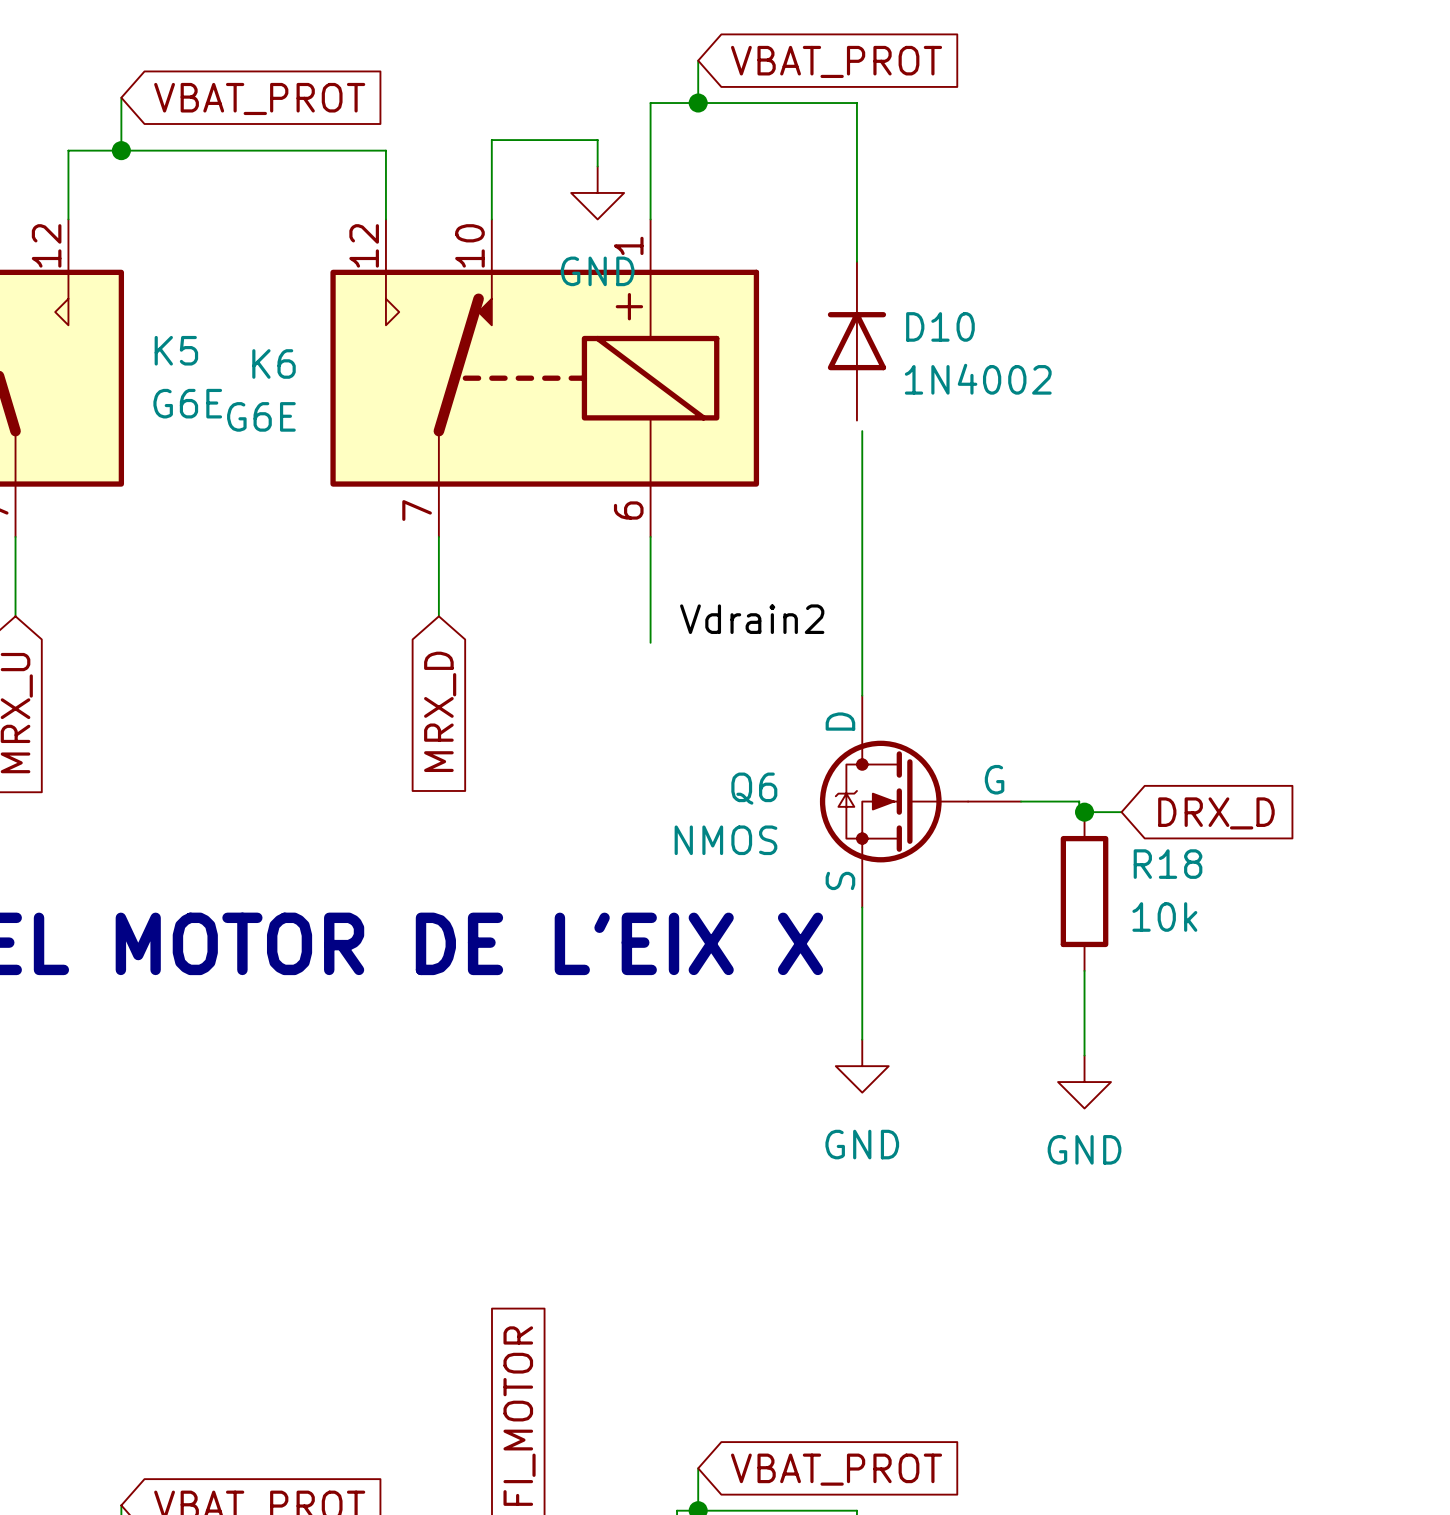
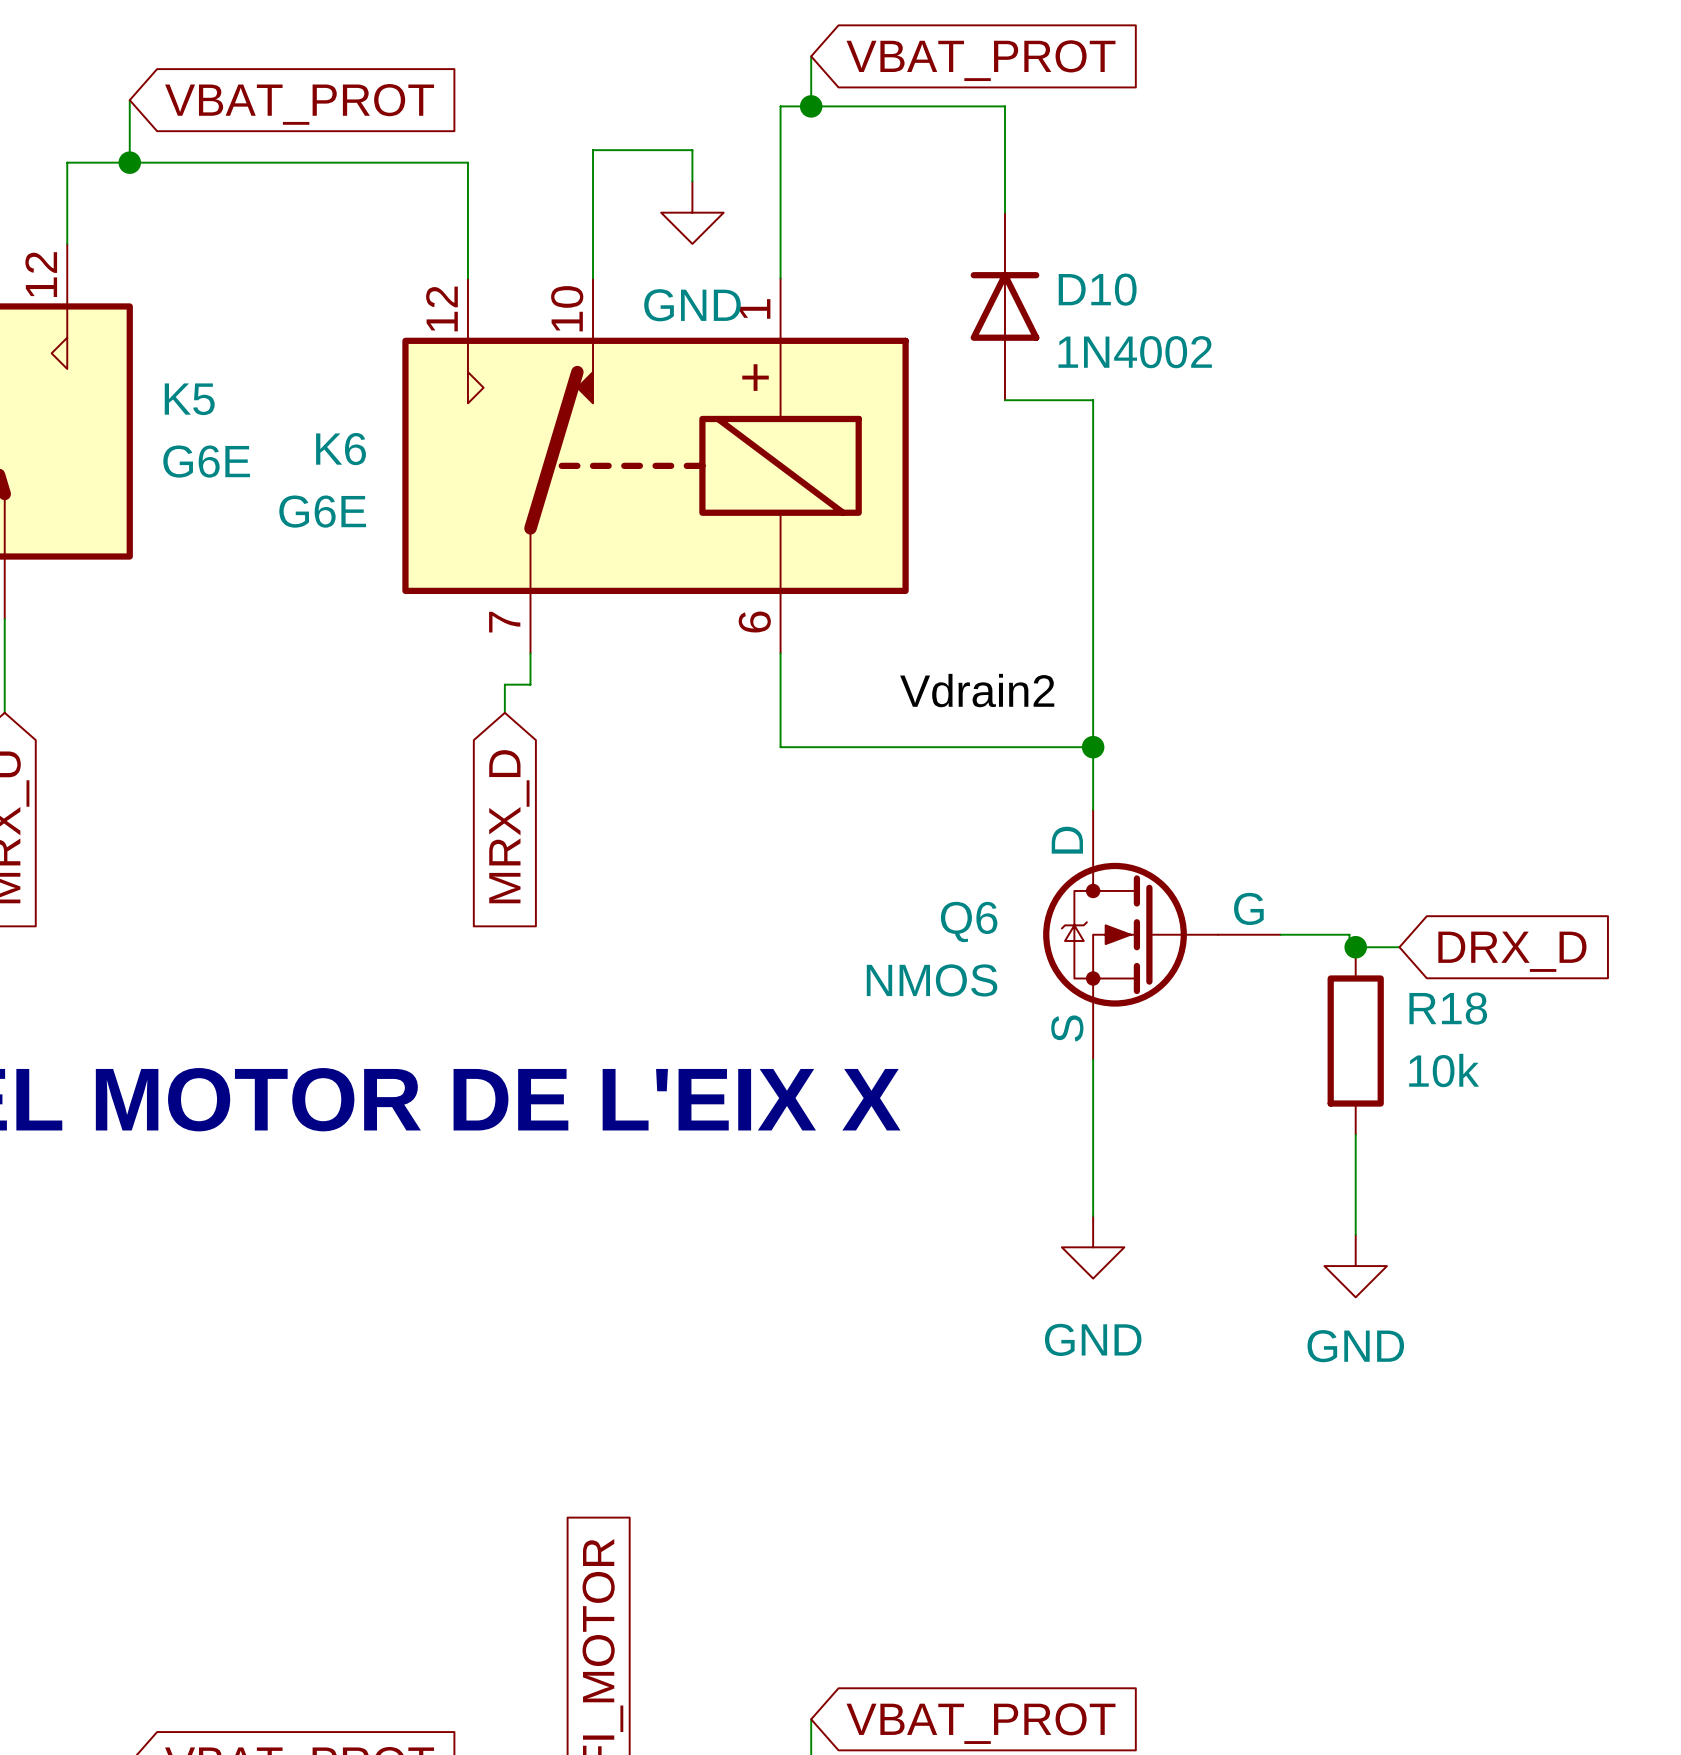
wire: (672, 103) (650, 103) (650, 219) -> (780, 106) (780, 278)
wire: (856, 103) (856, 261) -> (998, 106) (1004, 106) (1004, 212)
wire: (513, 140) (491, 140) (491, 219) -> (593, 150) (593, 278)
wire: (385, 150) (385, 219) -> (442, 162) (467, 162) (467, 278)
D10 position: (856, 341) -> (1004, 306)
wire: none -> (1004, 400) (1093, 400) (1093, 809)
K6 position: (544, 378) -> (655, 465)
wire: (862, 431) (862, 695) -> none
wire: (438, 536) (438, 592) -> (530, 653) (530, 684) (504, 684)
wire: (650, 536) (650, 642) -> none
wire: none -> (780, 653) (780, 747) (1093, 747)
label position: Vdrain2 (752, 619) -> Vdrain2 (977, 690)
junction: none -> (1093, 747)
Q6 position: (920, 801) -> (1161, 934)
wire: (1021, 801) (1079, 801) (1079, 812) (1121, 812) -> (1280, 934) (1349, 934) (1349, 947) (1399, 947)
junction position: (1084, 812) -> (1355, 947)
global label position: DRX_D (1216, 813) -> DRX_D (1512, 951)
R18 position: (1084, 891) -> (1355, 1041)
wire: (862, 907) (862, 1039) -> (1093, 1059) (1093, 1216)
wire: (1084, 970) (1084, 1055) -> (1355, 1134) (1355, 1234)
power symbol: GND (862, 1066) -> none
power symbol: none -> GND (1093, 1247)
power symbol: GND (1084, 1082) -> none
power symbol: none -> GND (1355, 1266)

